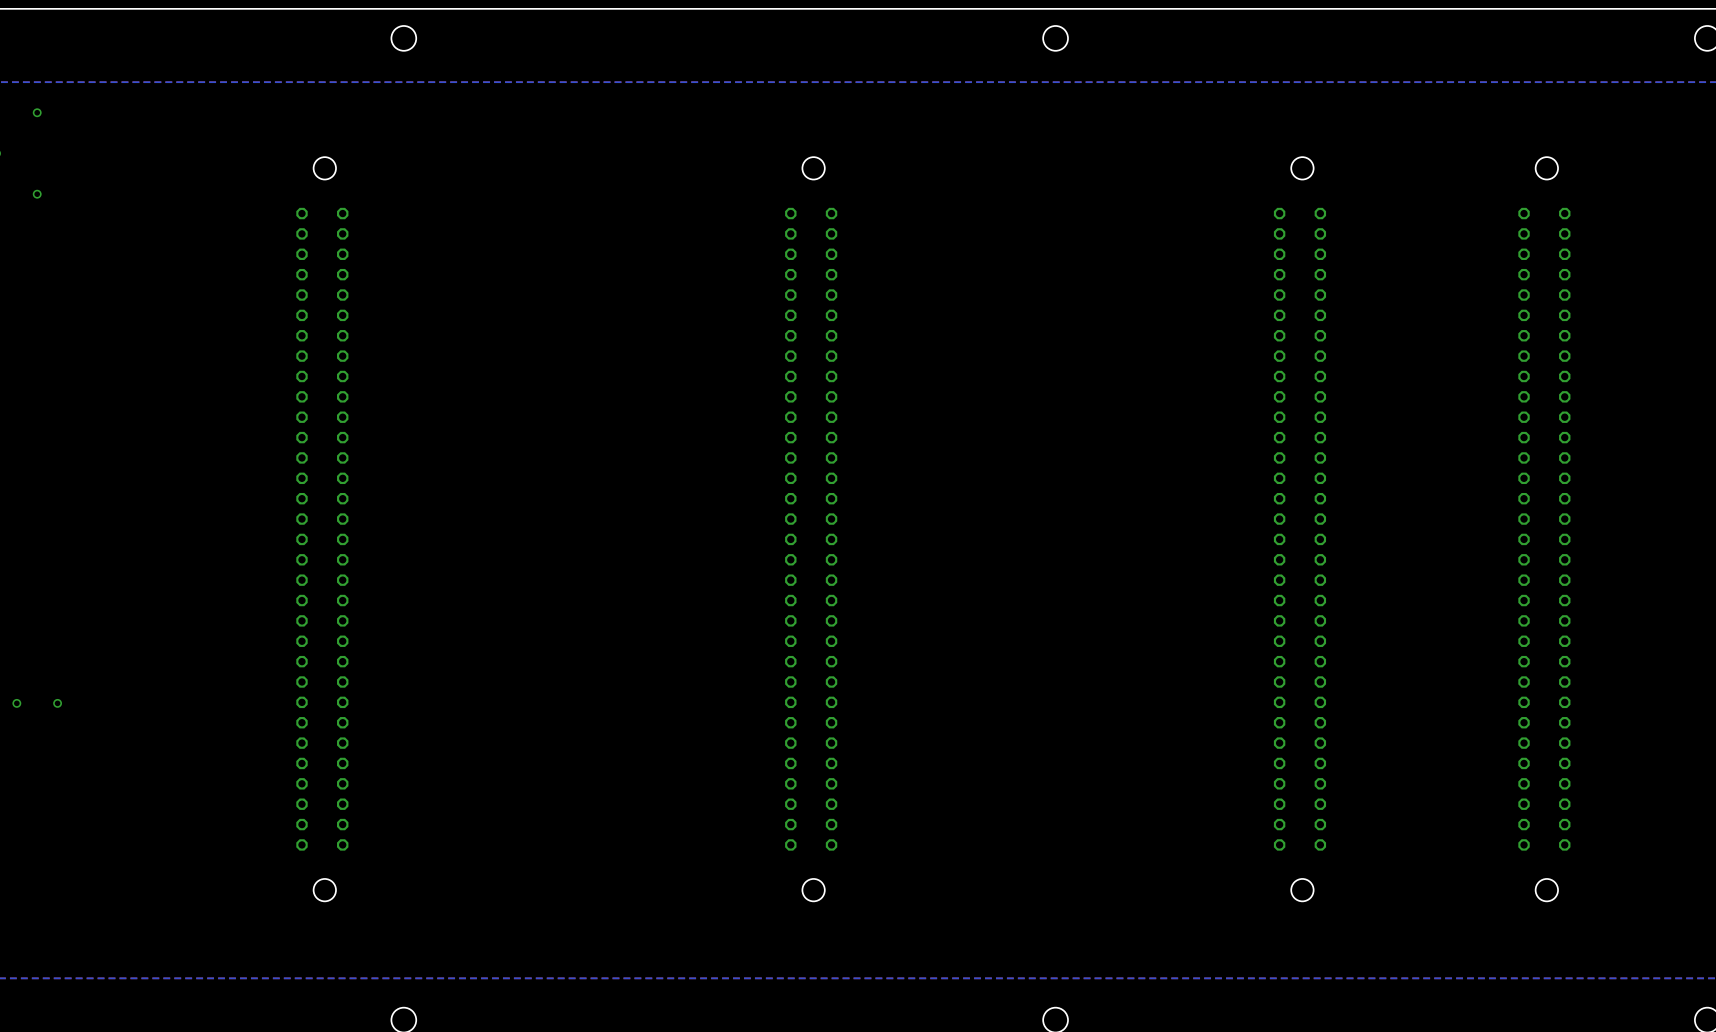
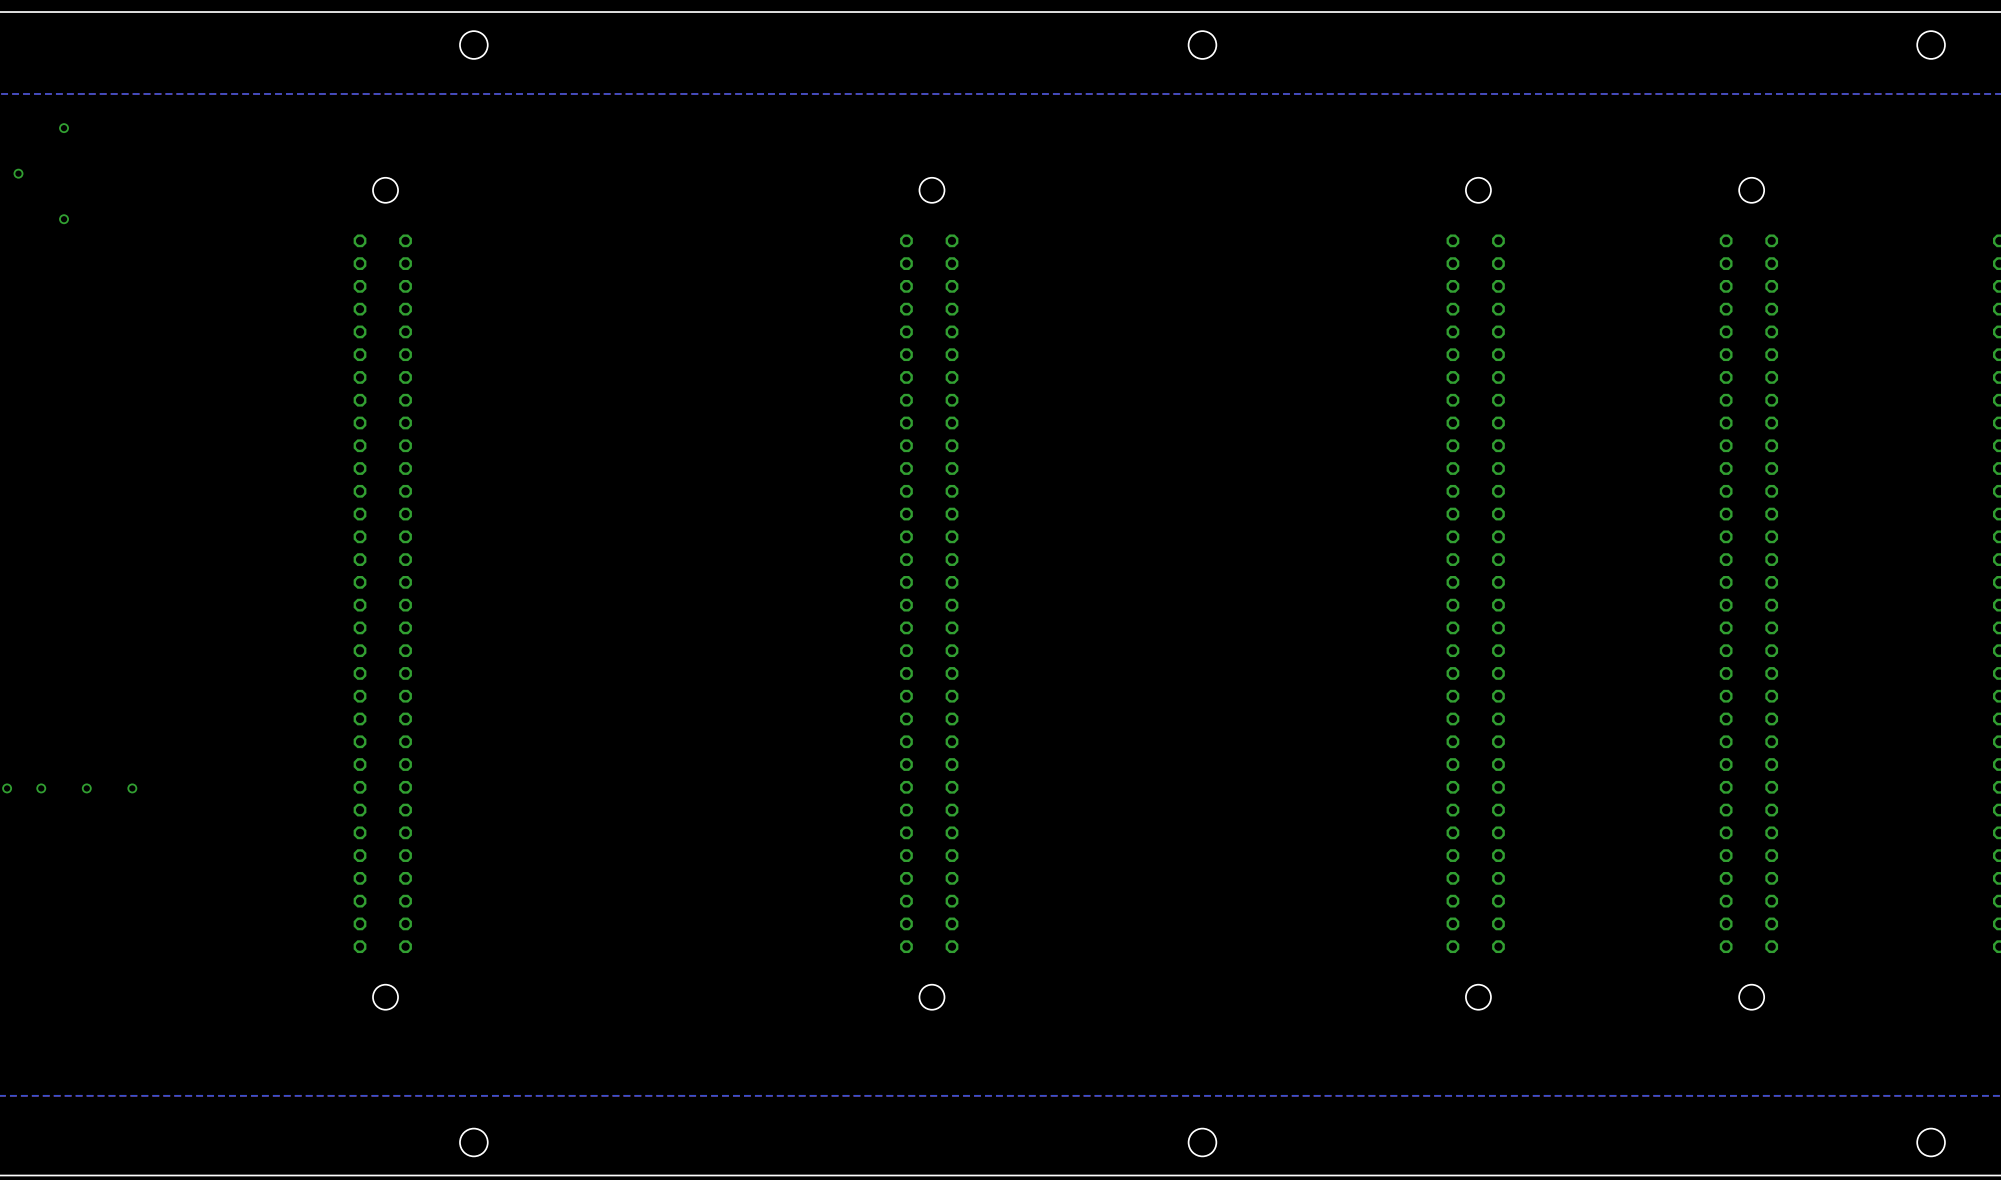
via: none -> (132, 788)

